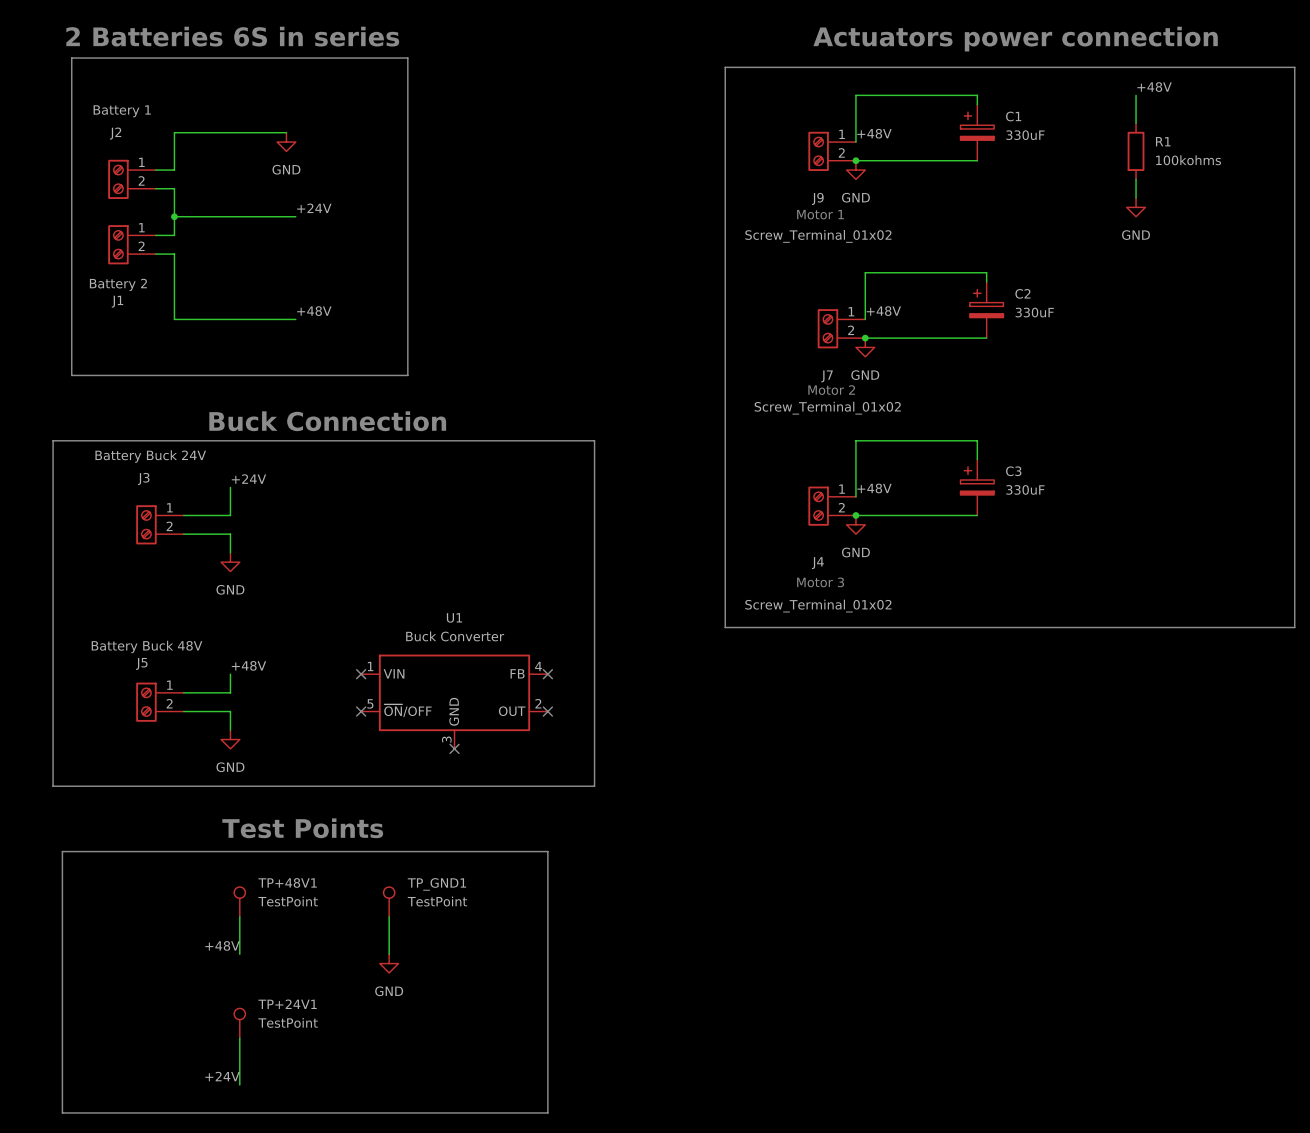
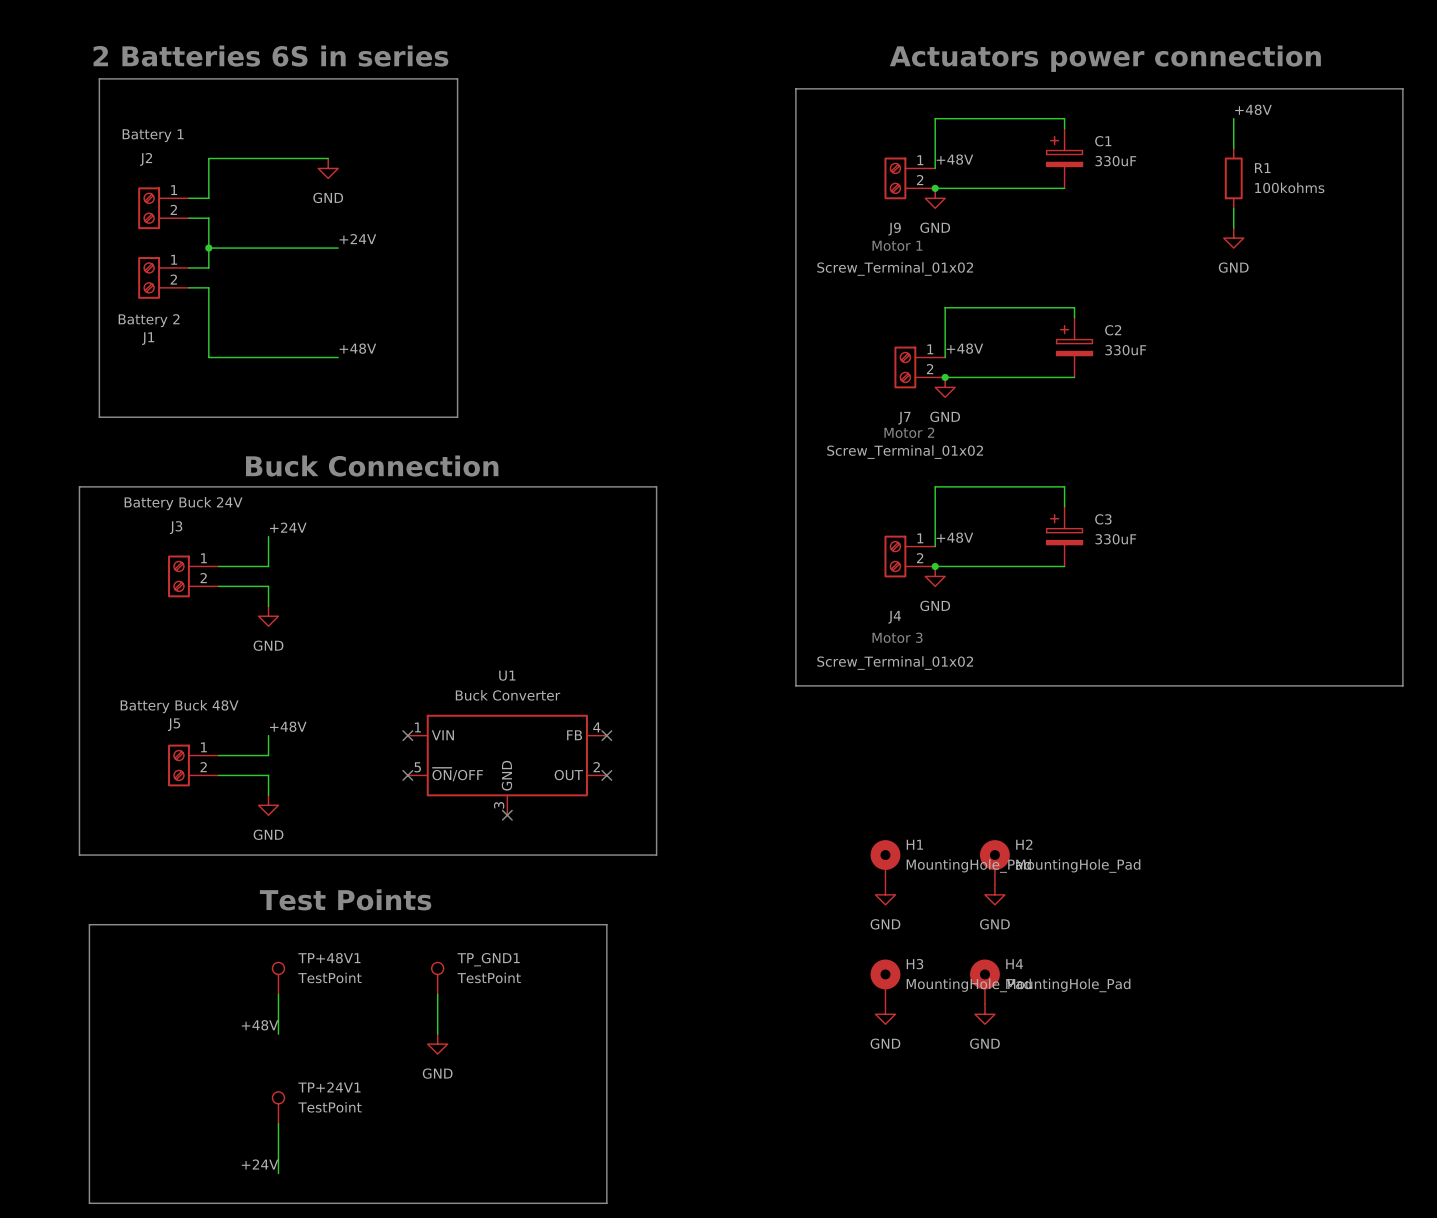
H1: none -> MountingHole_Pad (885, 862)
H2: none -> MountingHole_Pad (994, 862)
power symbol: none -> GND (885, 894)
power symbol: none -> GND (994, 894)
H3: none -> MountingHole_Pad (885, 981)
H4: none -> MountingHole_Pad (984, 981)
power symbol: none -> GND (885, 1014)
power symbol: none -> GND (984, 1014)

